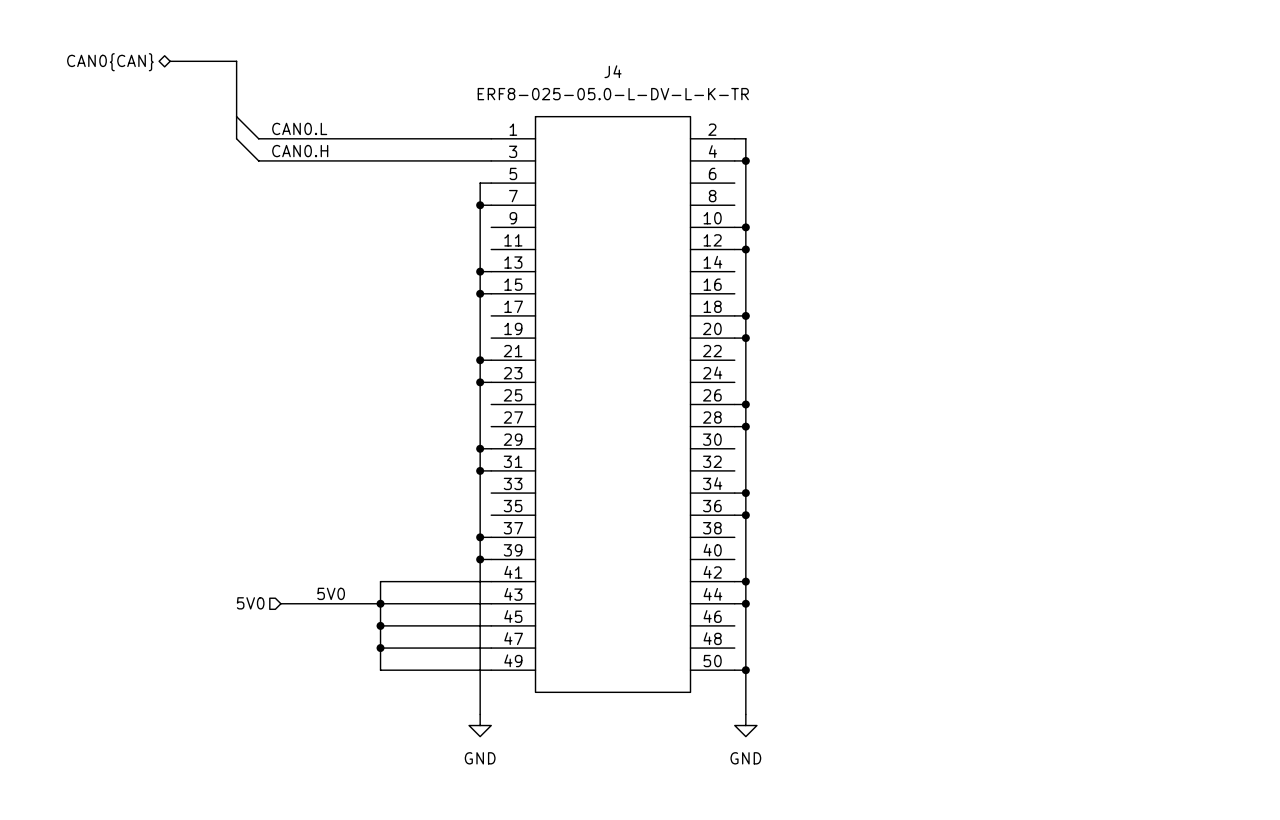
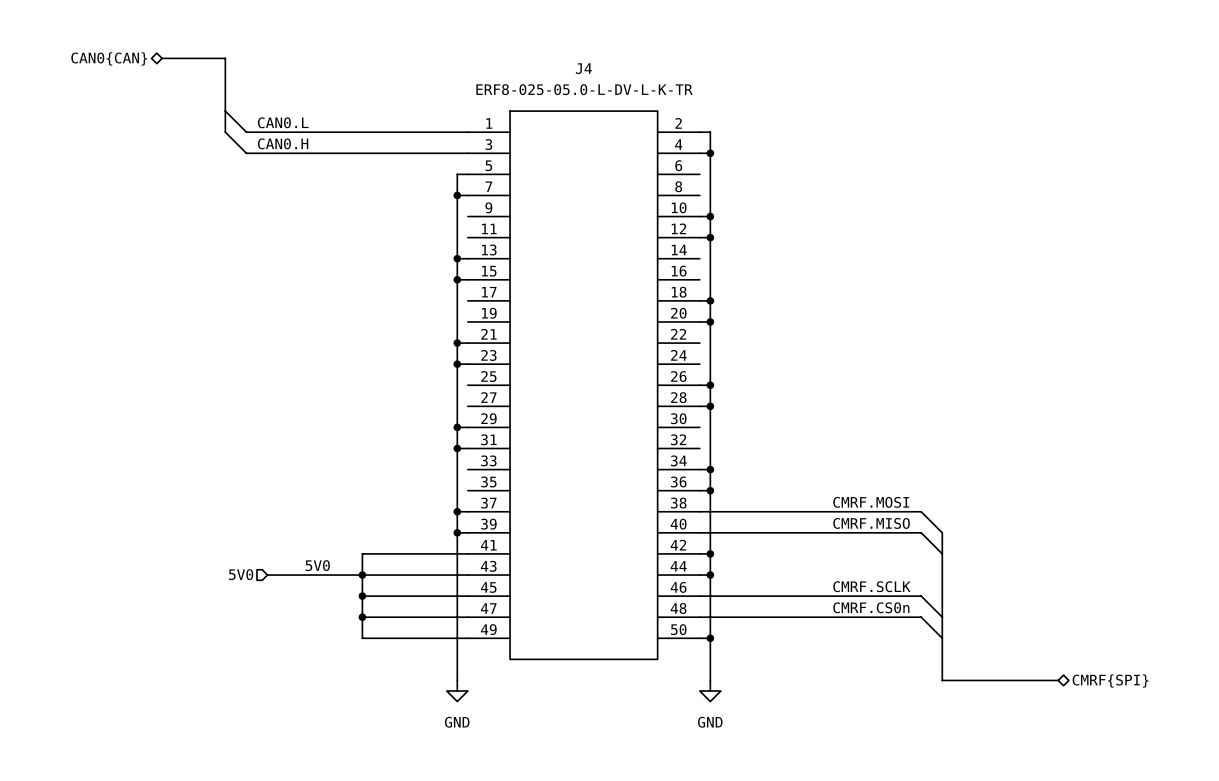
label: none -> CMRF.MOSI (871, 502)
wire: none -> (699, 511) (921, 511) (942, 532)
label: none -> CMRF.MISO (871, 523)
wire: none -> (699, 532) (921, 532) (942, 553)
bus: none -> (942, 532) (942, 680) (1058, 680)
label: none -> CMRF.SCLK (871, 586)
wire: none -> (699, 596) (921, 596) (942, 617)
label: none -> CMRF.CS0n (871, 607)
wire: none -> (699, 617) (921, 617) (942, 638)
hierarchical label: none -> CMRF{SPI} (1110, 681)

